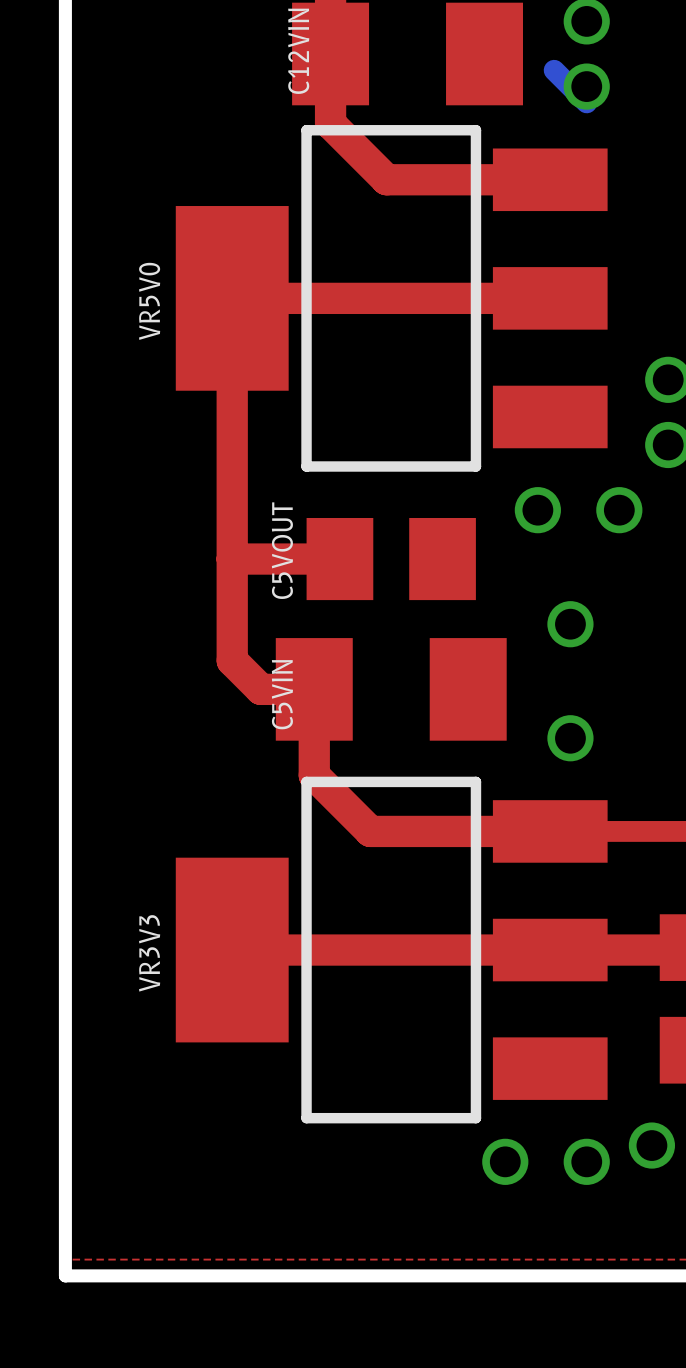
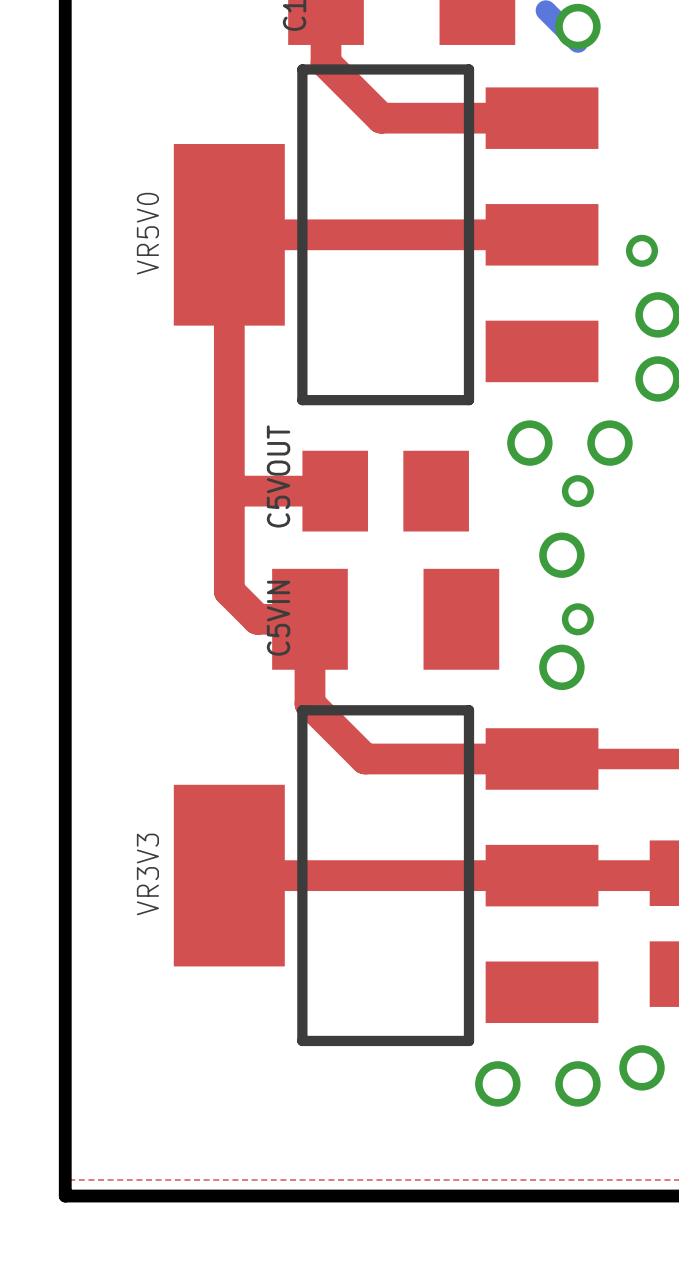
via: none -> (642, 250)
via: none -> (577, 491)
via: none -> (577, 619)

